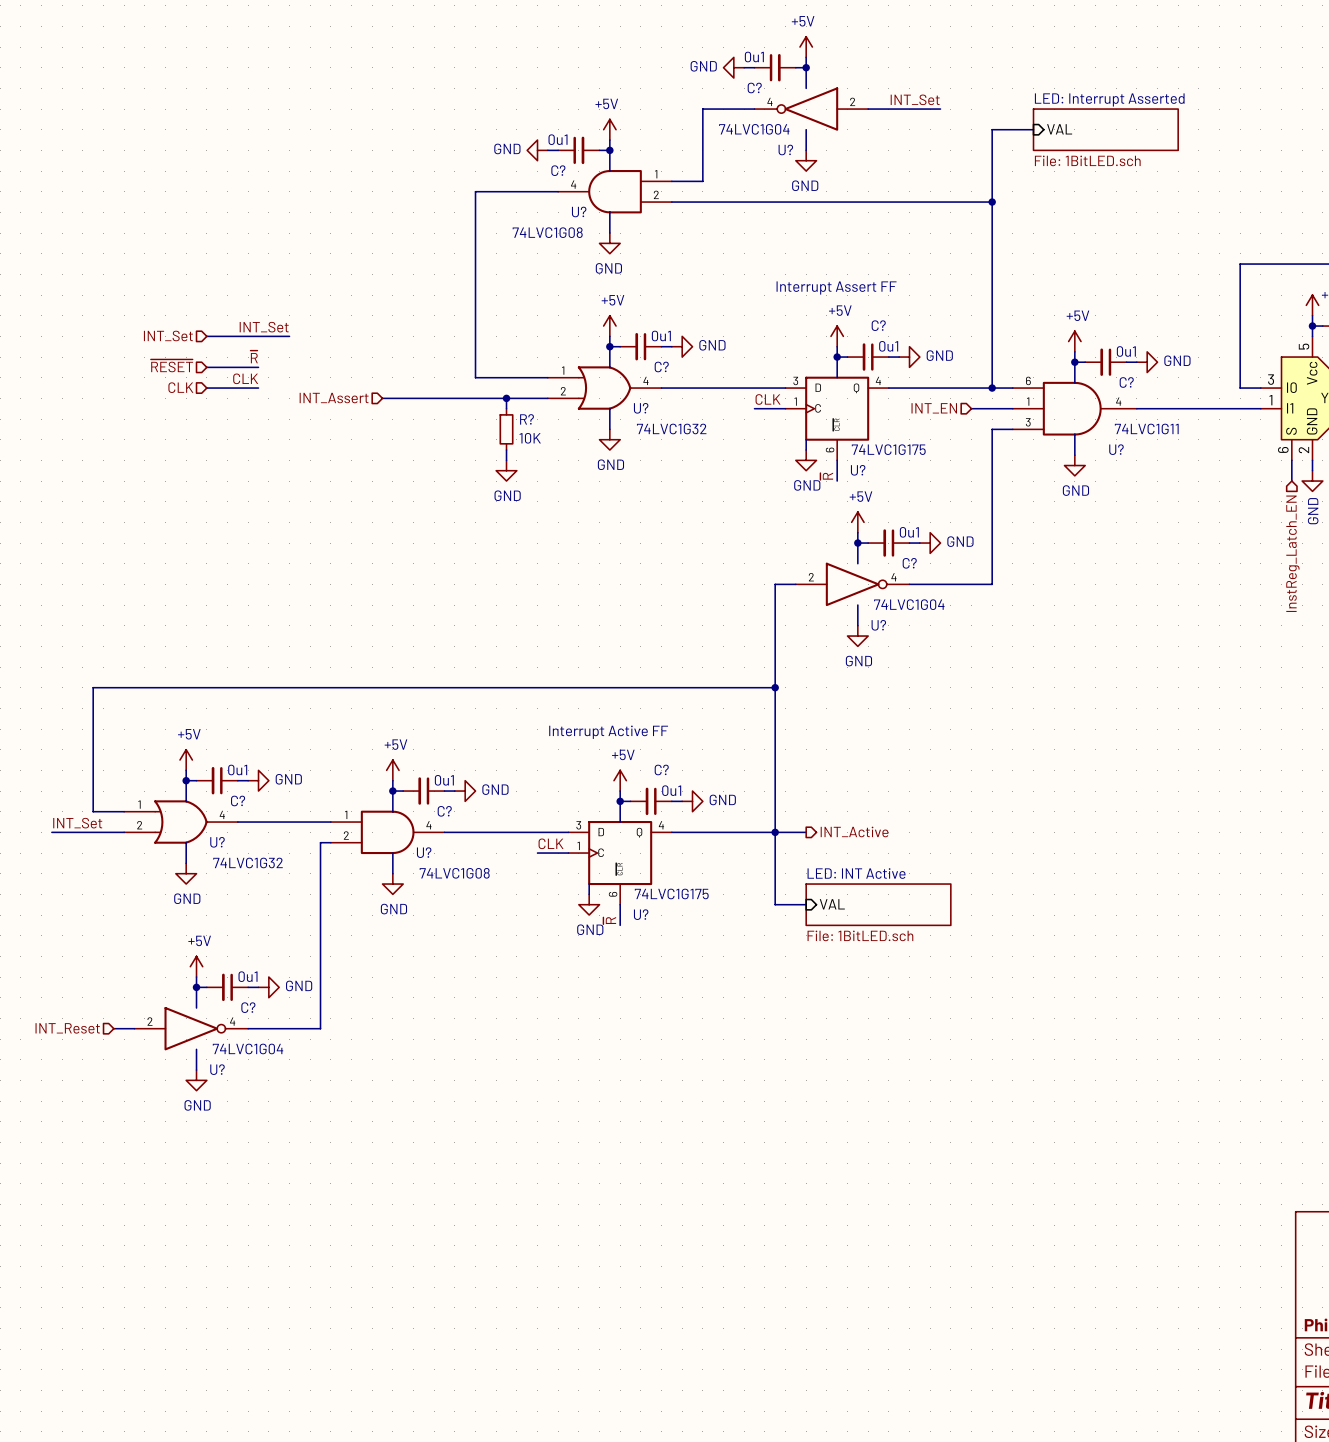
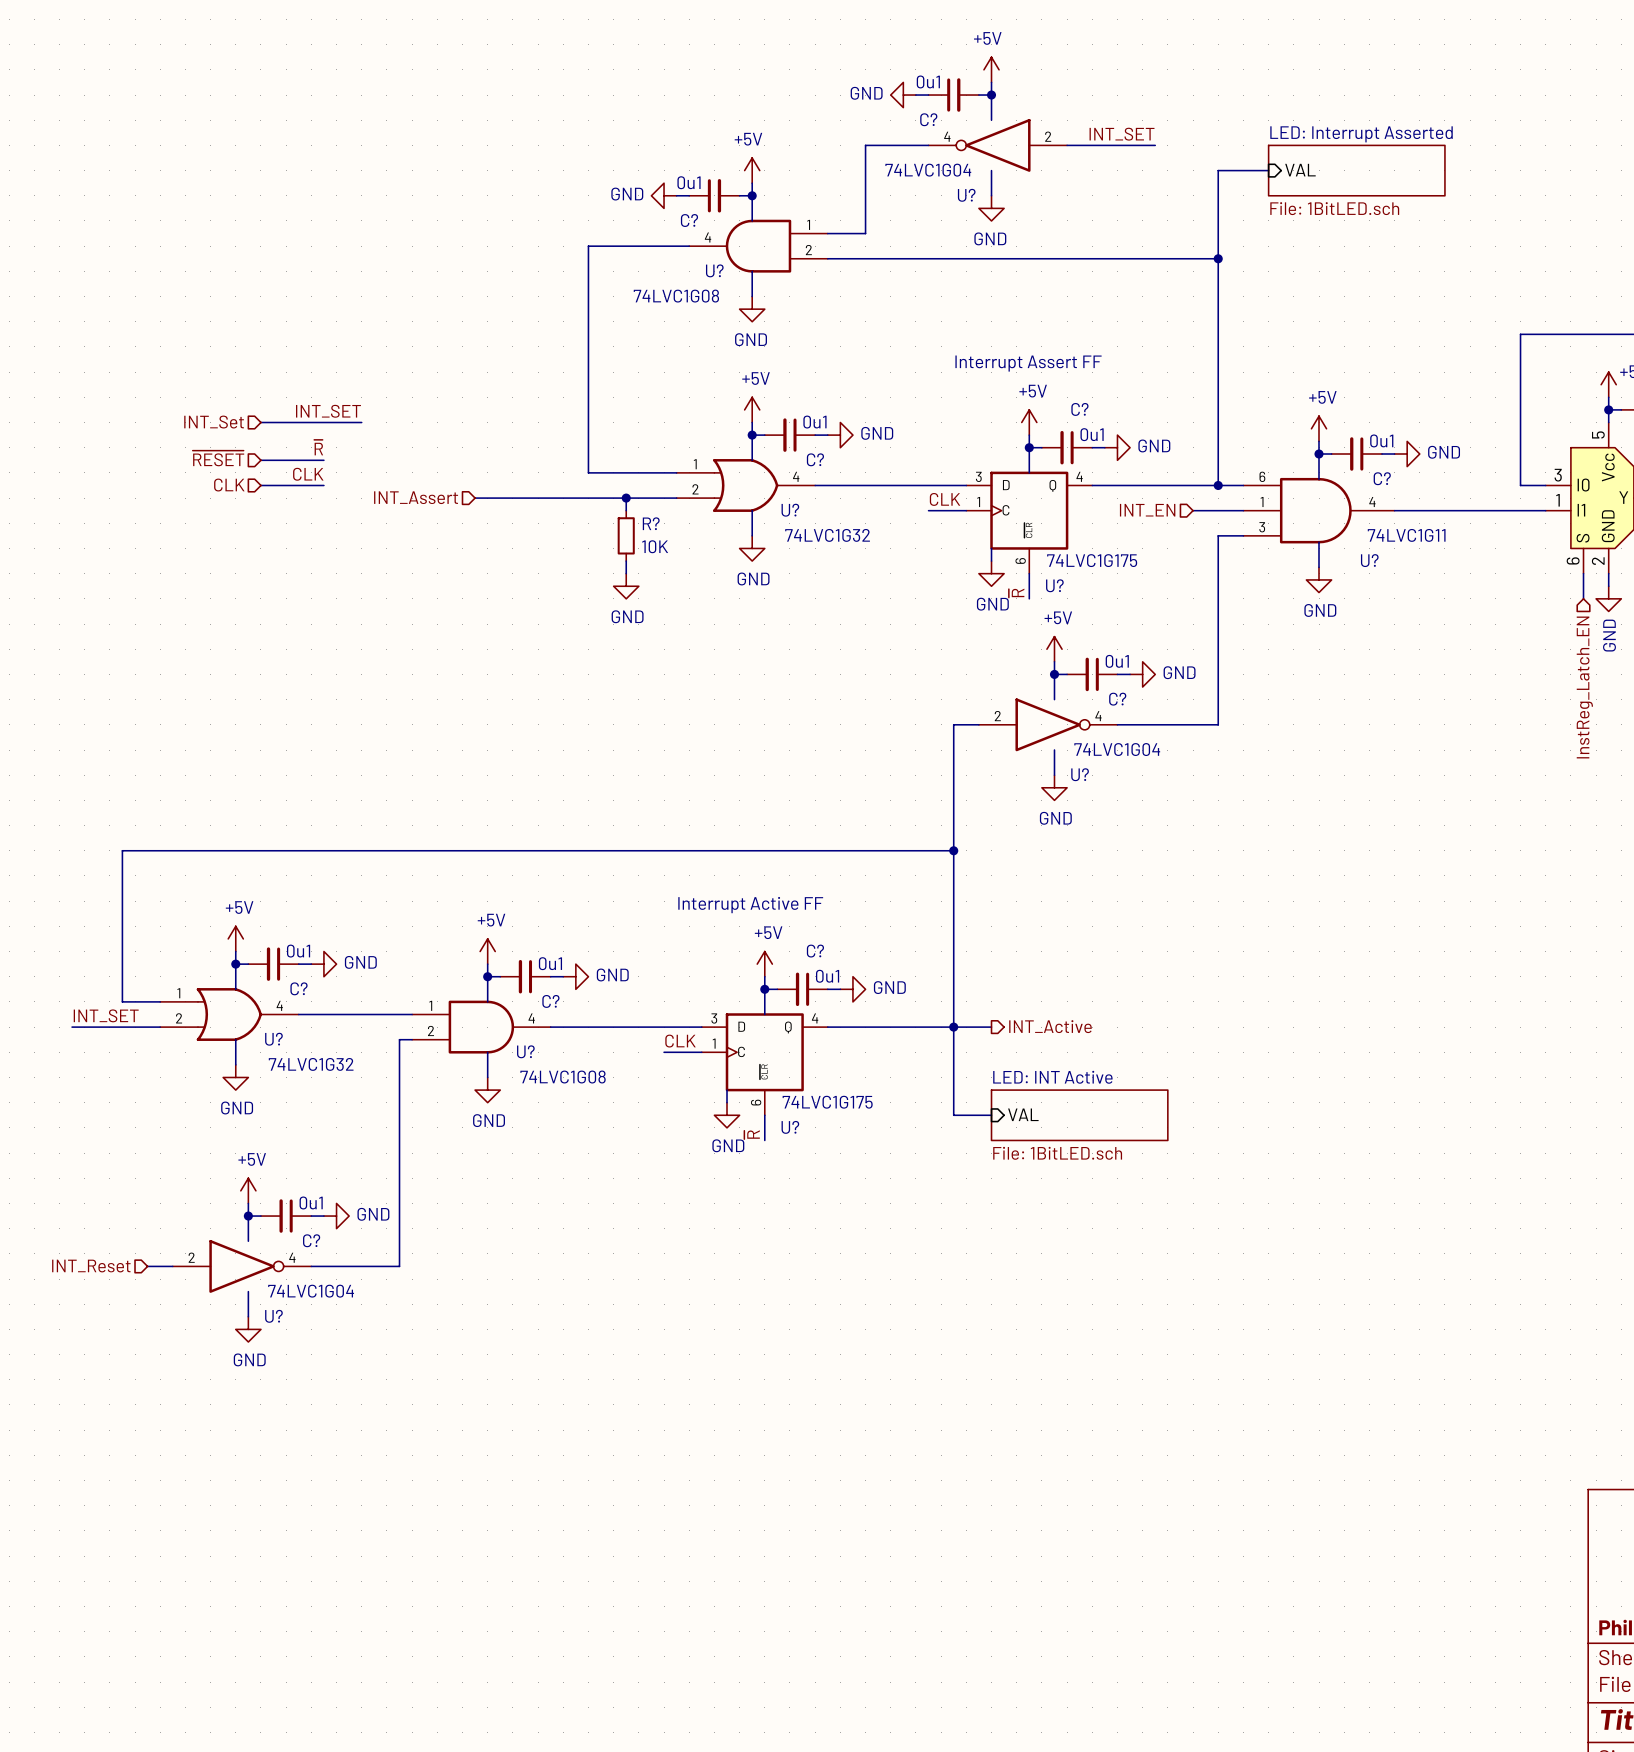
label: INT_Set (915, 99) -> INT_SET (1122, 134)
label: INT_Set (264, 327) -> INT_SET (328, 411)
label: INT_Set (77, 823) -> INT_SET (106, 1015)

